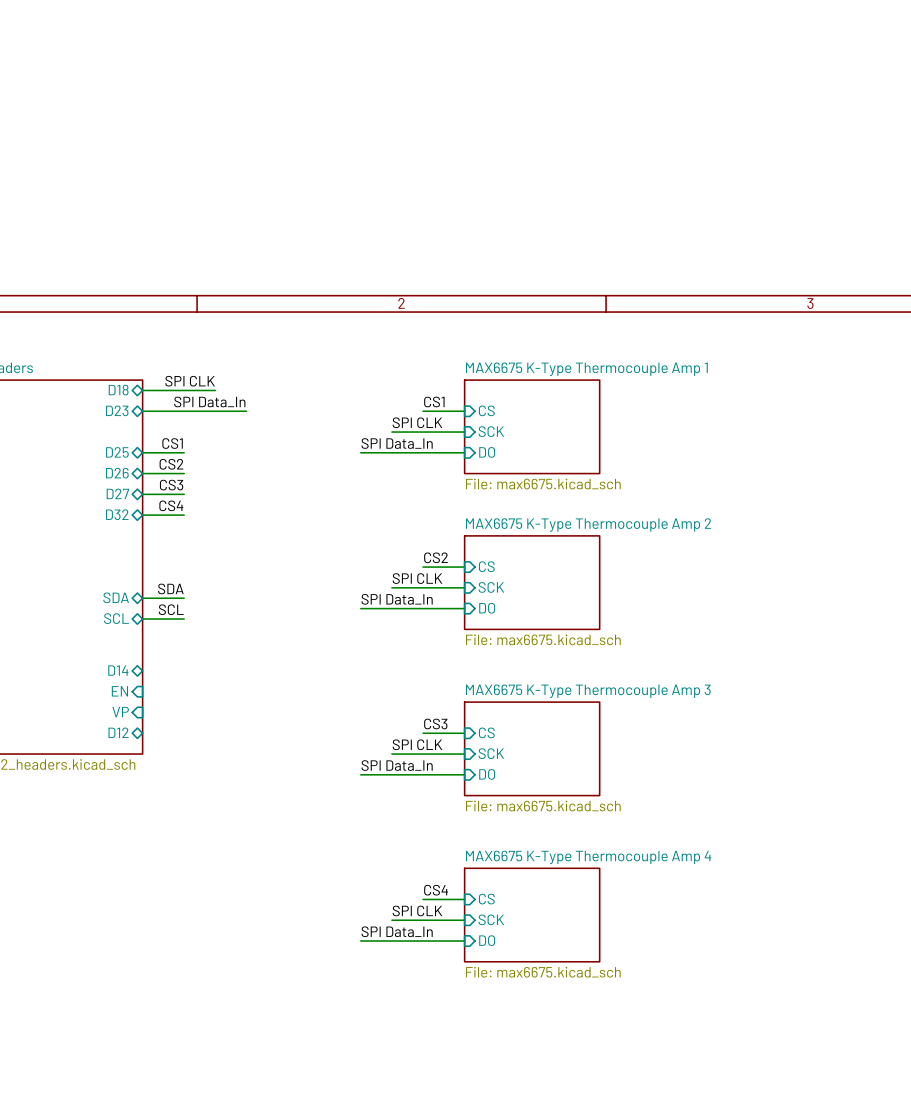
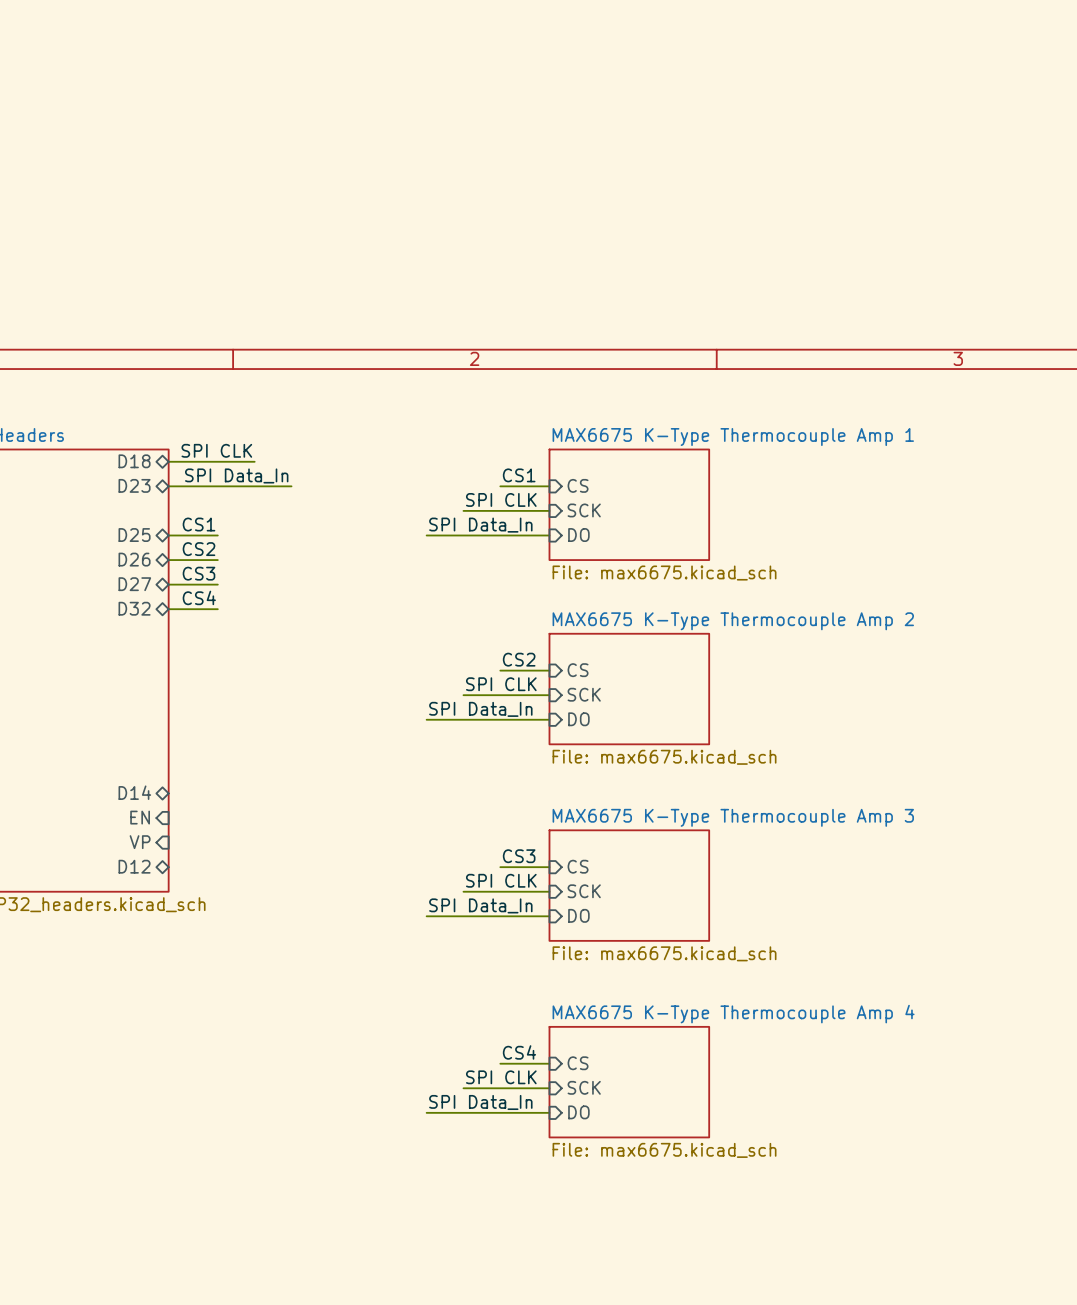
label: SDA (170, 588) -> none
sheet pin: SDA (116, 597) -> none
wire: (142, 598) (184, 598) -> none
label: SCL (171, 609) -> none
sheet pin: SCL (116, 618) -> none
wire: (142, 619) (184, 619) -> none

